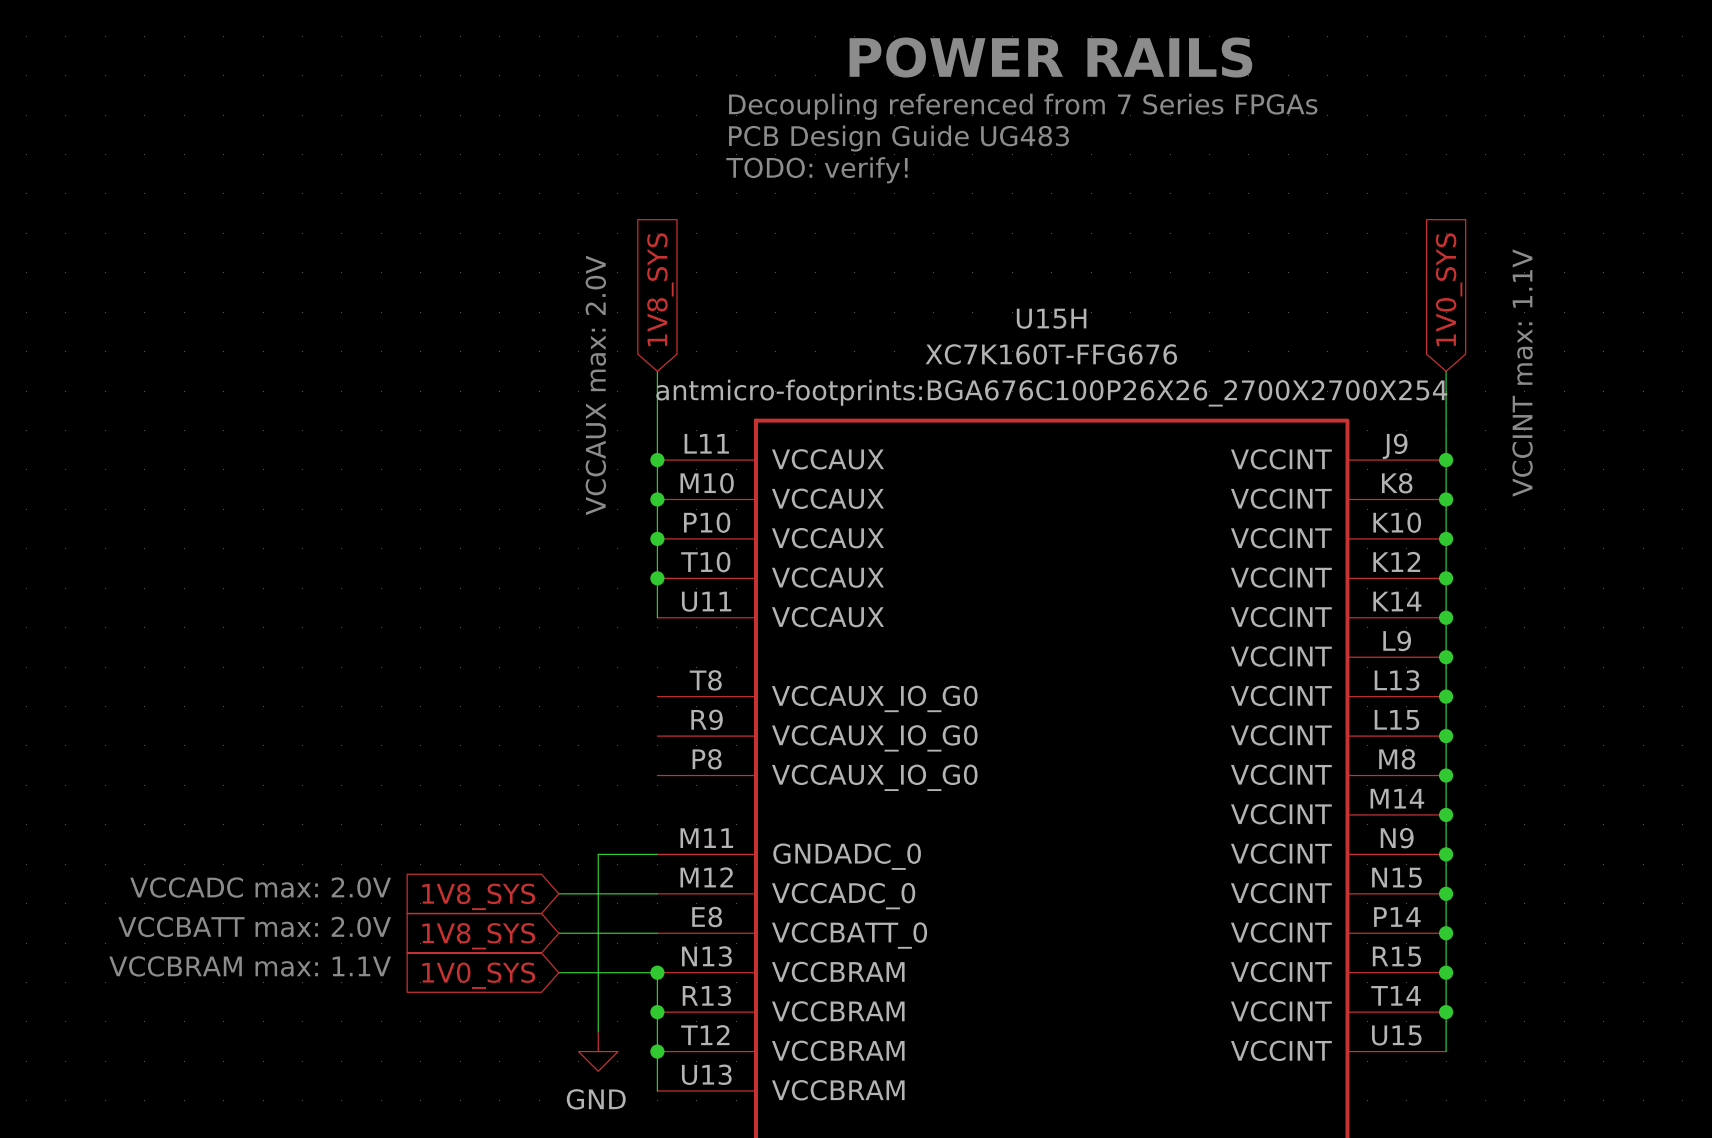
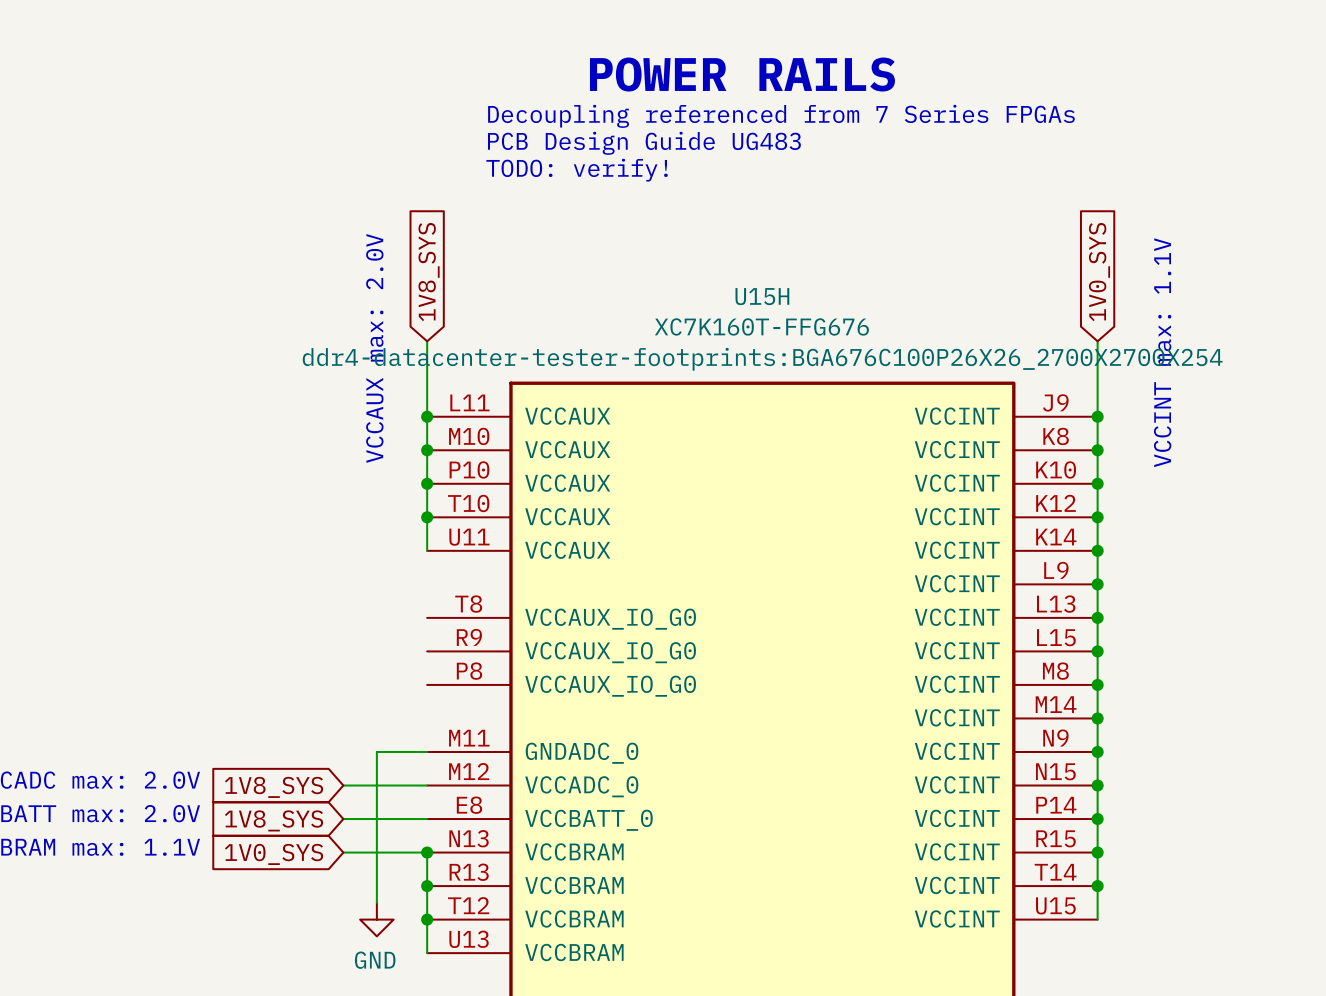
U15H text: antmicro-footprints:BGA676C100P26X26_2700X2700X254 (1051, 393) -> ddr4-datacenter-tester-footprints:BGA676C100P26X26_2700X2700X254 (762, 359)

